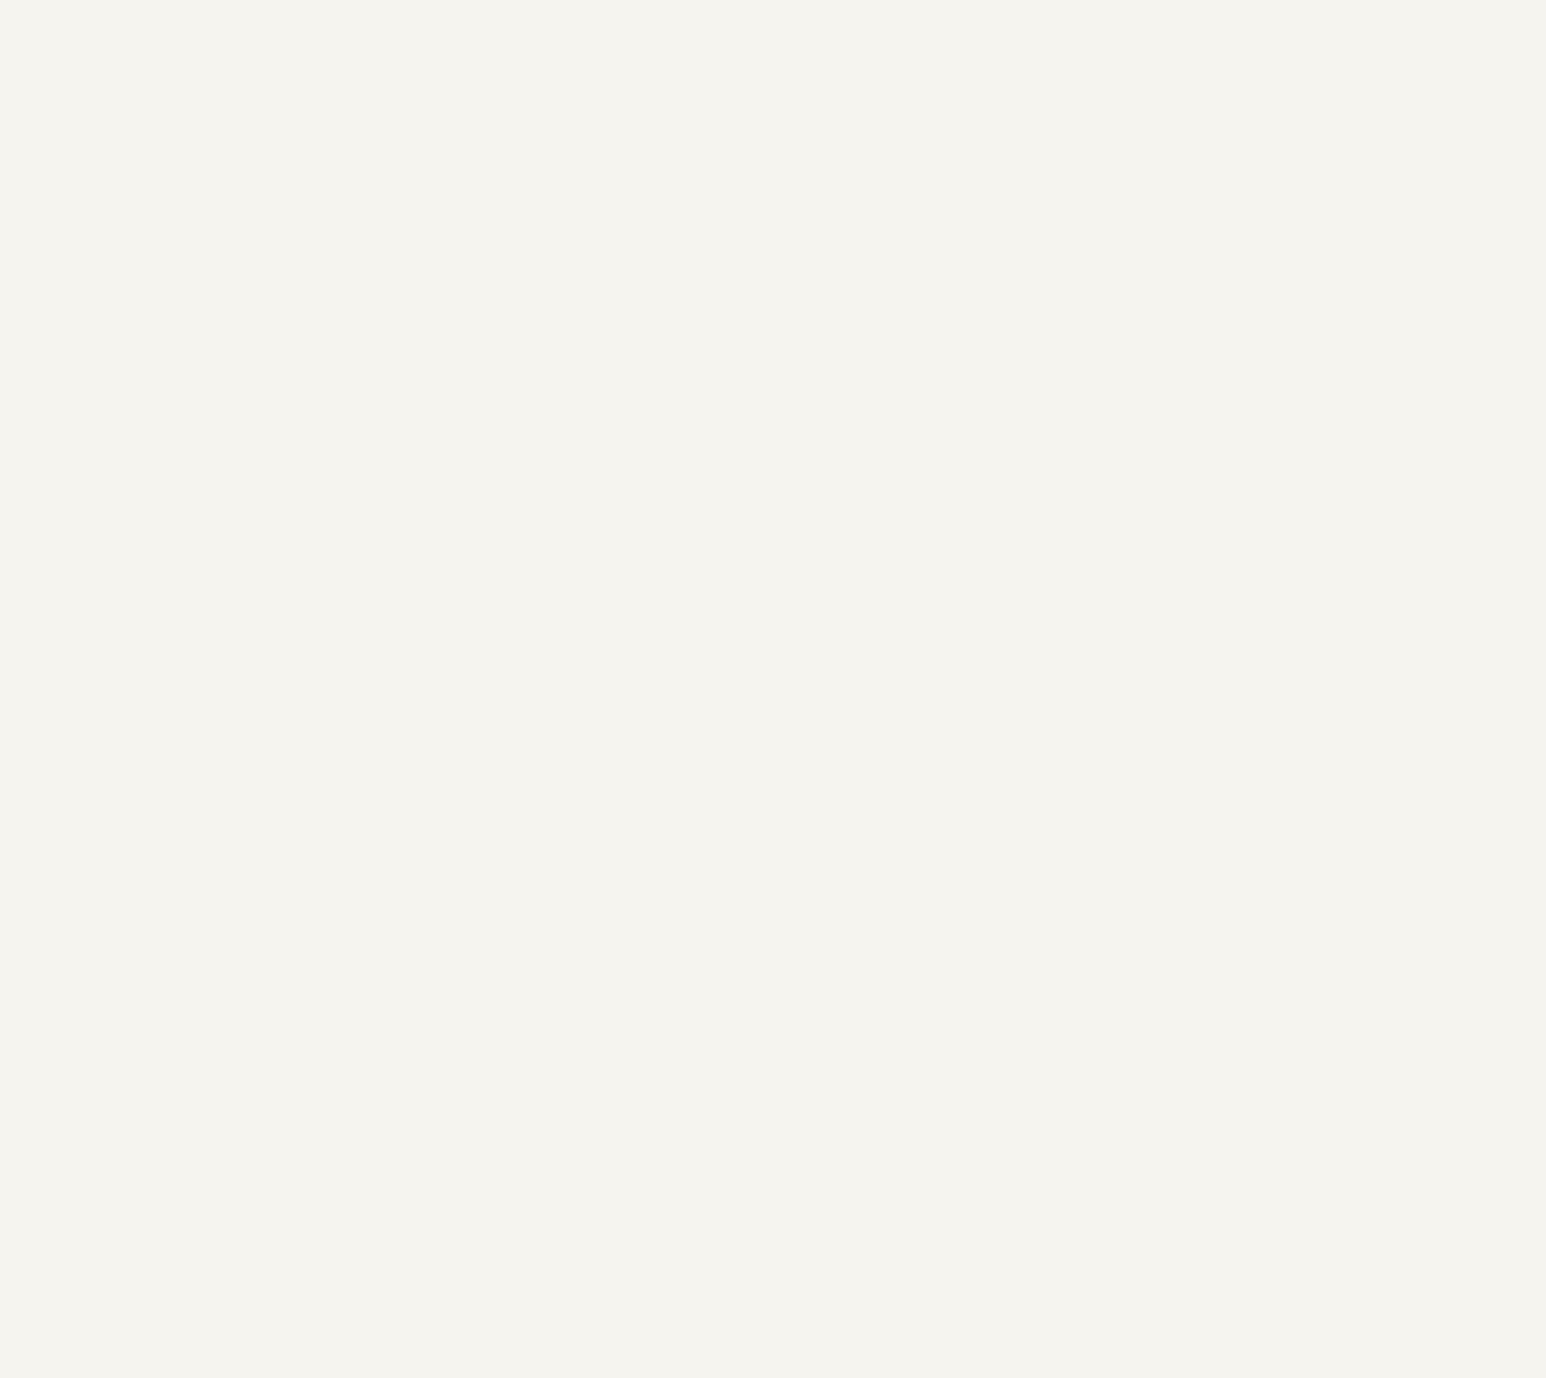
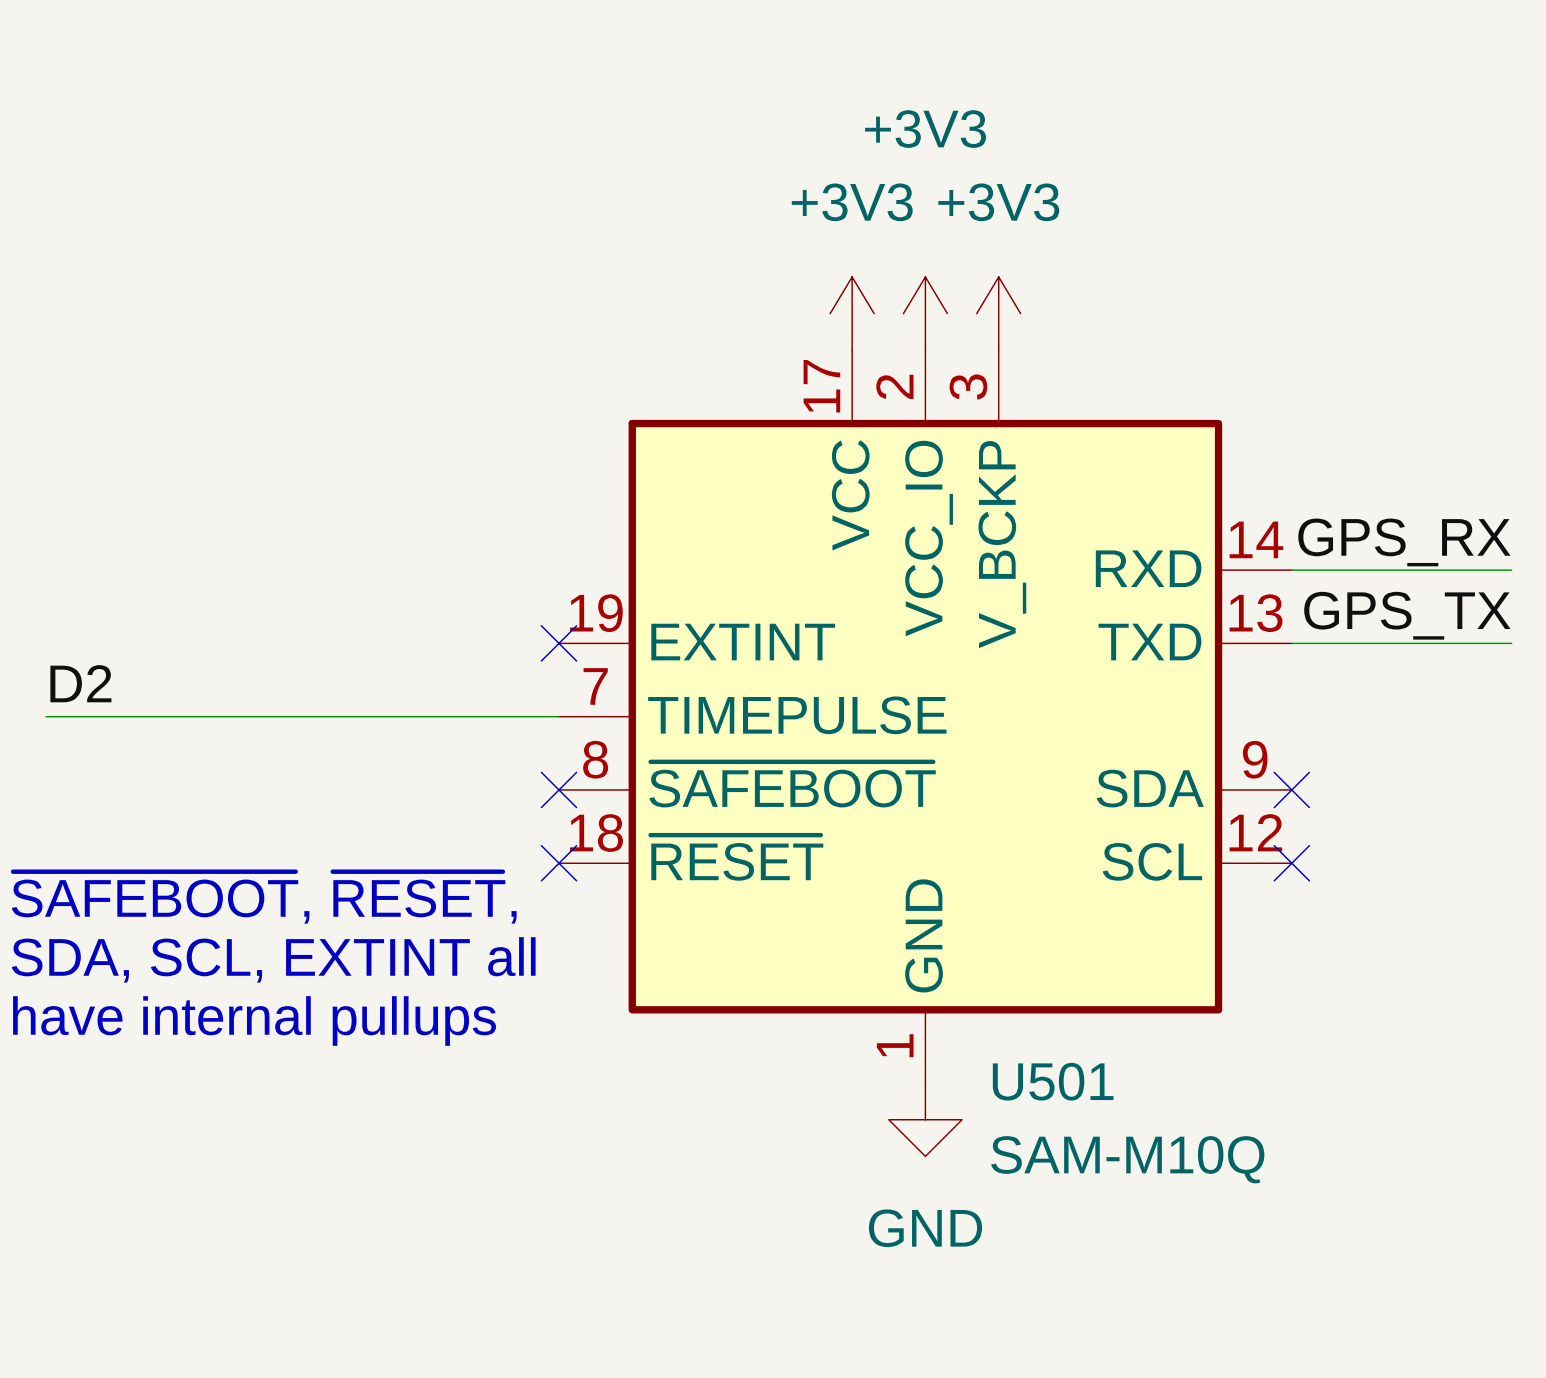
power symbol: none -> +3V3 (852, 313)
power symbol: none -> +3V3 (925, 313)
power symbol: none -> +3V3 (998, 313)
label: none -> GPS_RX (1404, 542)
wire: none -> (1291, 570) (1511, 570)
label: none -> GPS_TX (1407, 615)
no-connect mark: none -> (559, 643)
wire: none -> (1291, 643) (1511, 643)
label: none -> D2 (80, 683)
wire: none -> (46, 716) (559, 716)
U501: none -> SAM-M10Q (925, 716)
no-connect mark: none -> (559, 789)
no-connect mark: none -> (1291, 789)
no-connect mark: none -> (559, 863)
no-connect mark: none -> (1291, 863)
text: none -> ~{SAFEBOOT}, ~{RESET}, (264, 897)
text: none -> SDA, SCL, EXTINT all (273, 959)
text: none -> have internal pullups (254, 1020)
power symbol: none -> GND (925, 1119)

